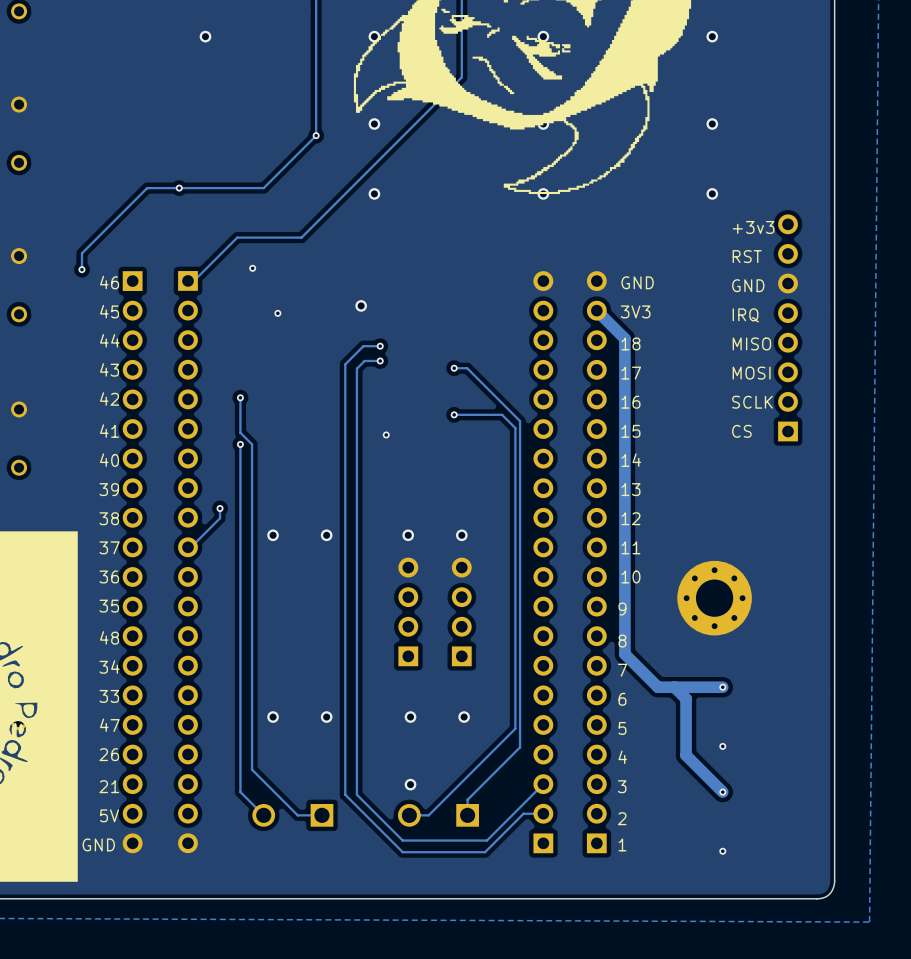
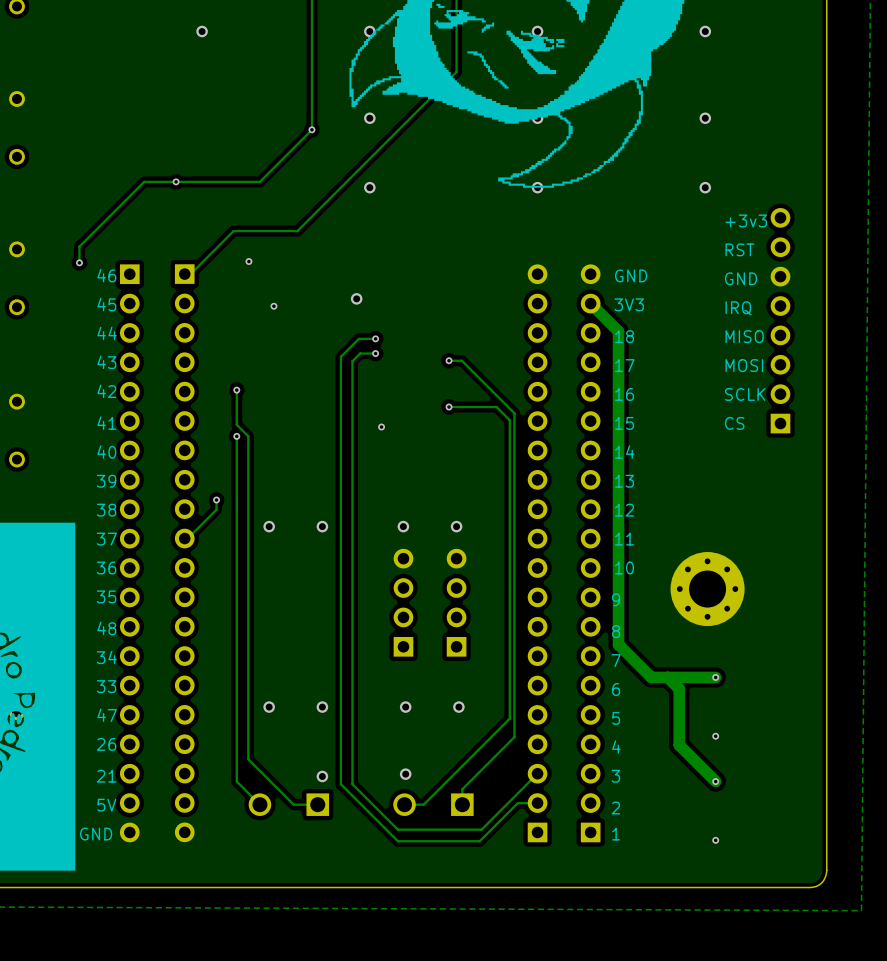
via: none -> (322, 776)

